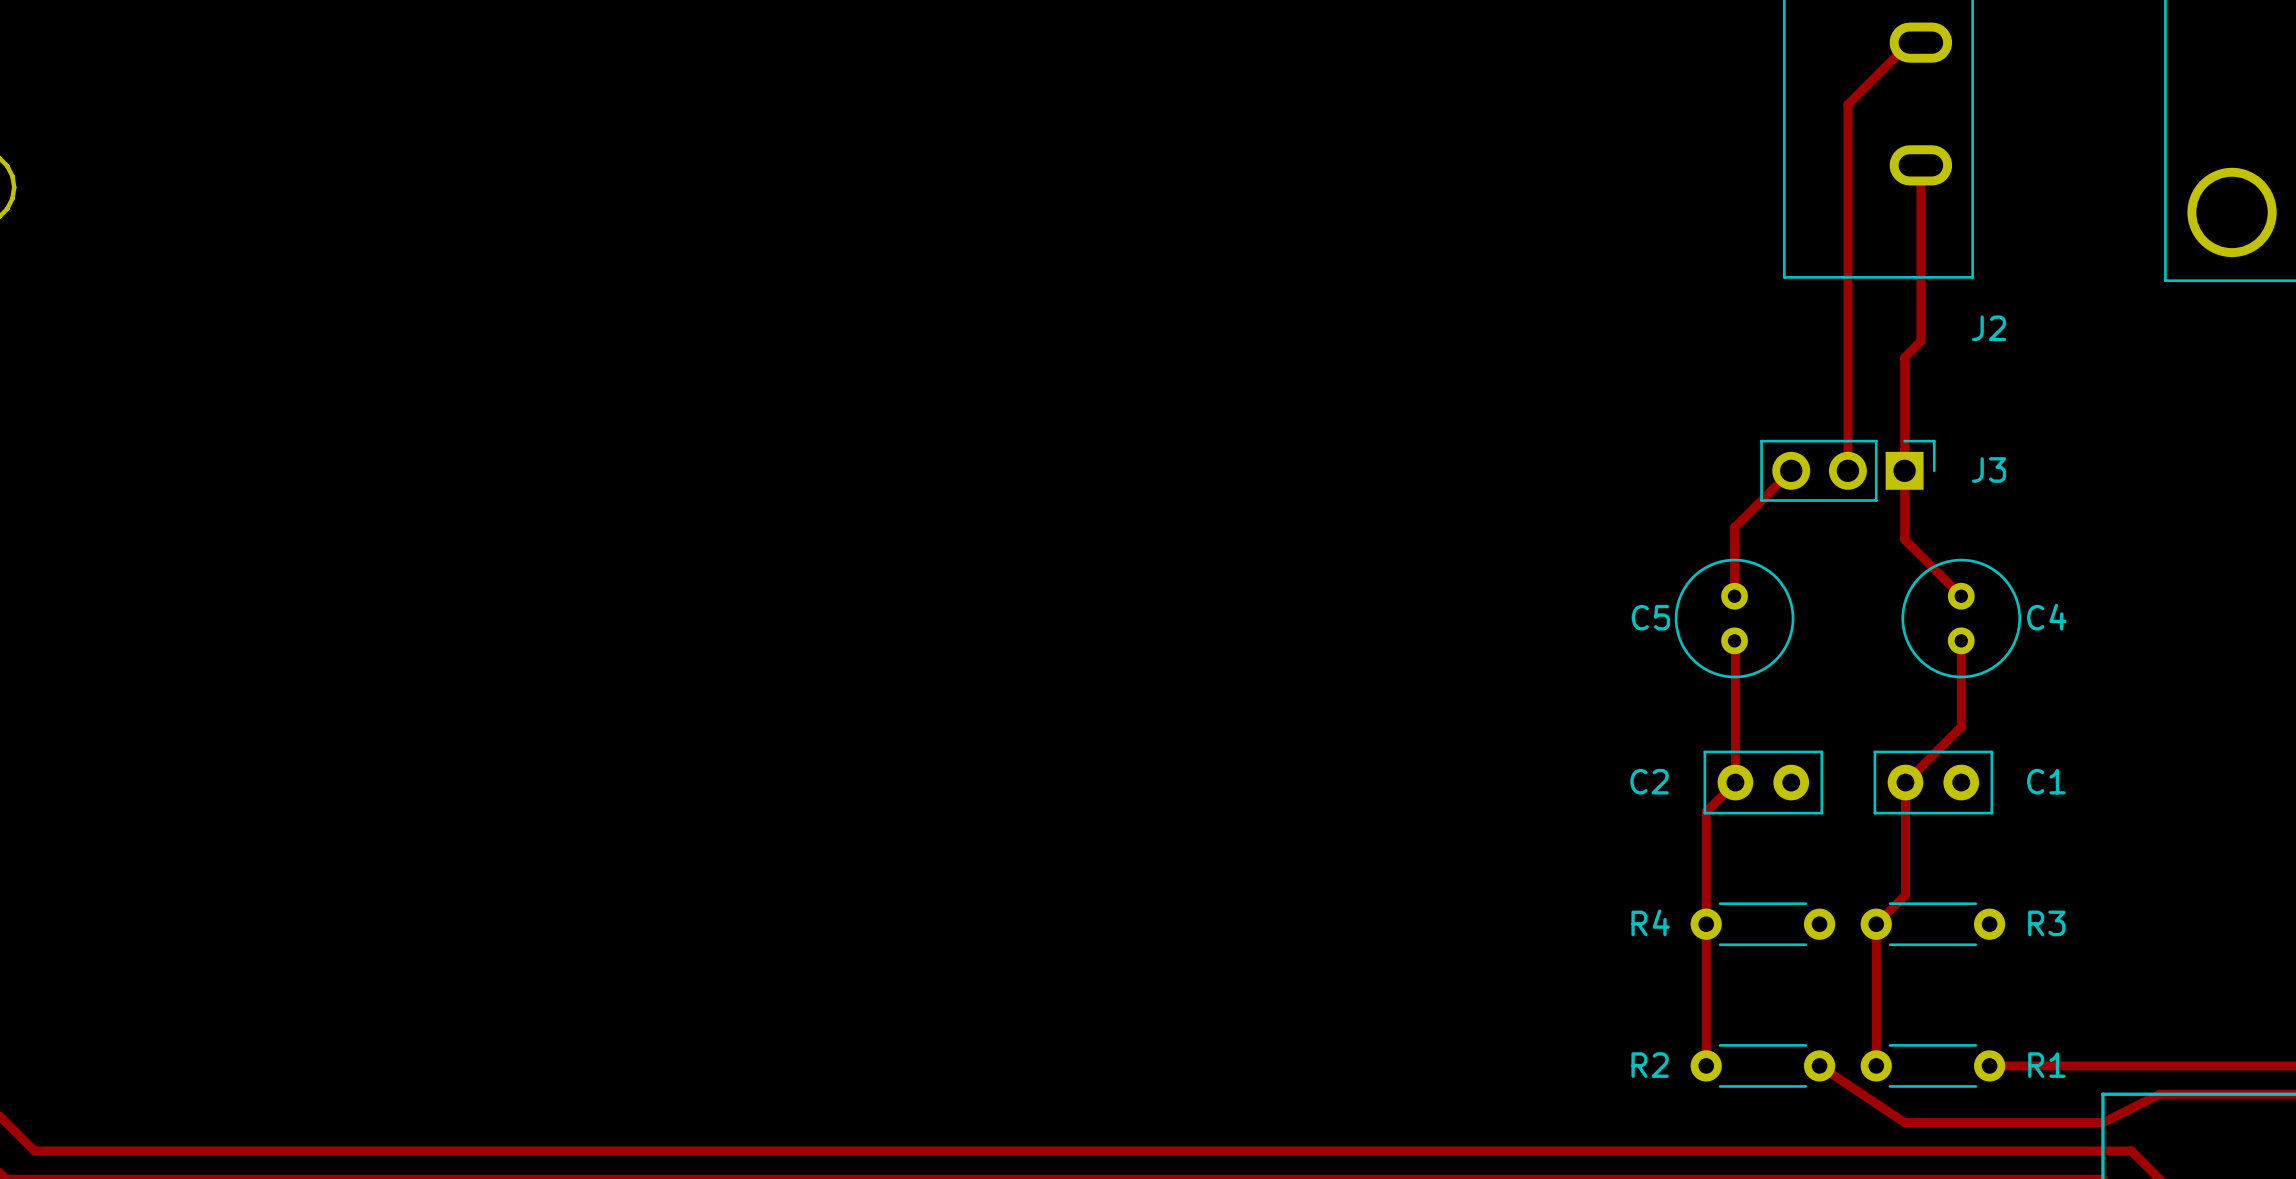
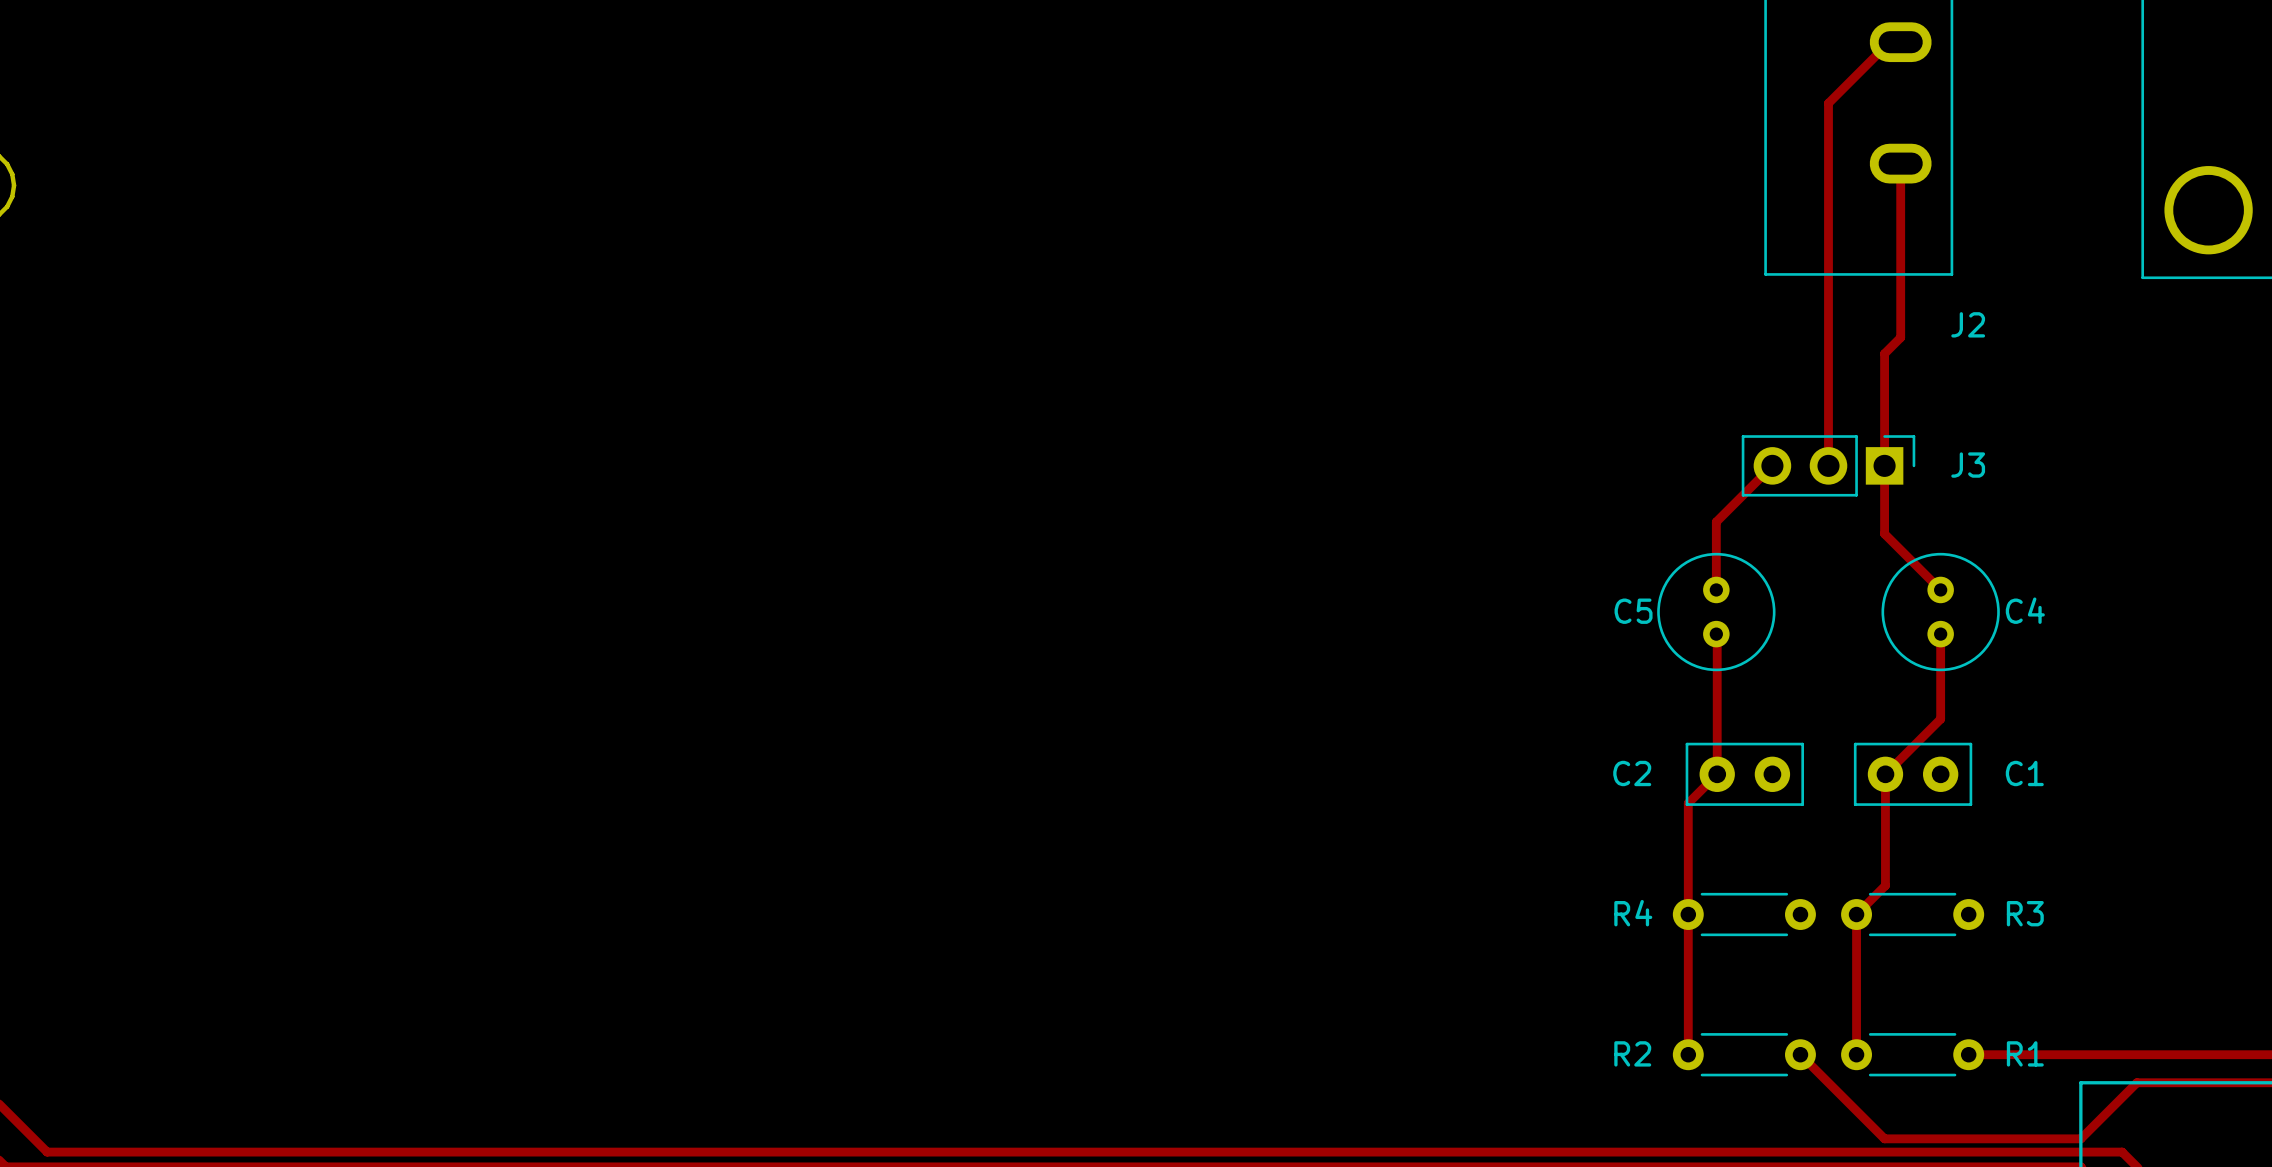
track: (1819, 1065) (1904, 1122) (2102, 1122) (2159, 1094) -> (1800, 1054) (1884, 1138)
track: (34, 1150) (1904, 1150) -> (33, 1138) (47, 1152) (2122, 1152)
track: (2102, 1150) (2131, 1150) (2144, 1164) -> (2080, 1138) (2136, 1082)

